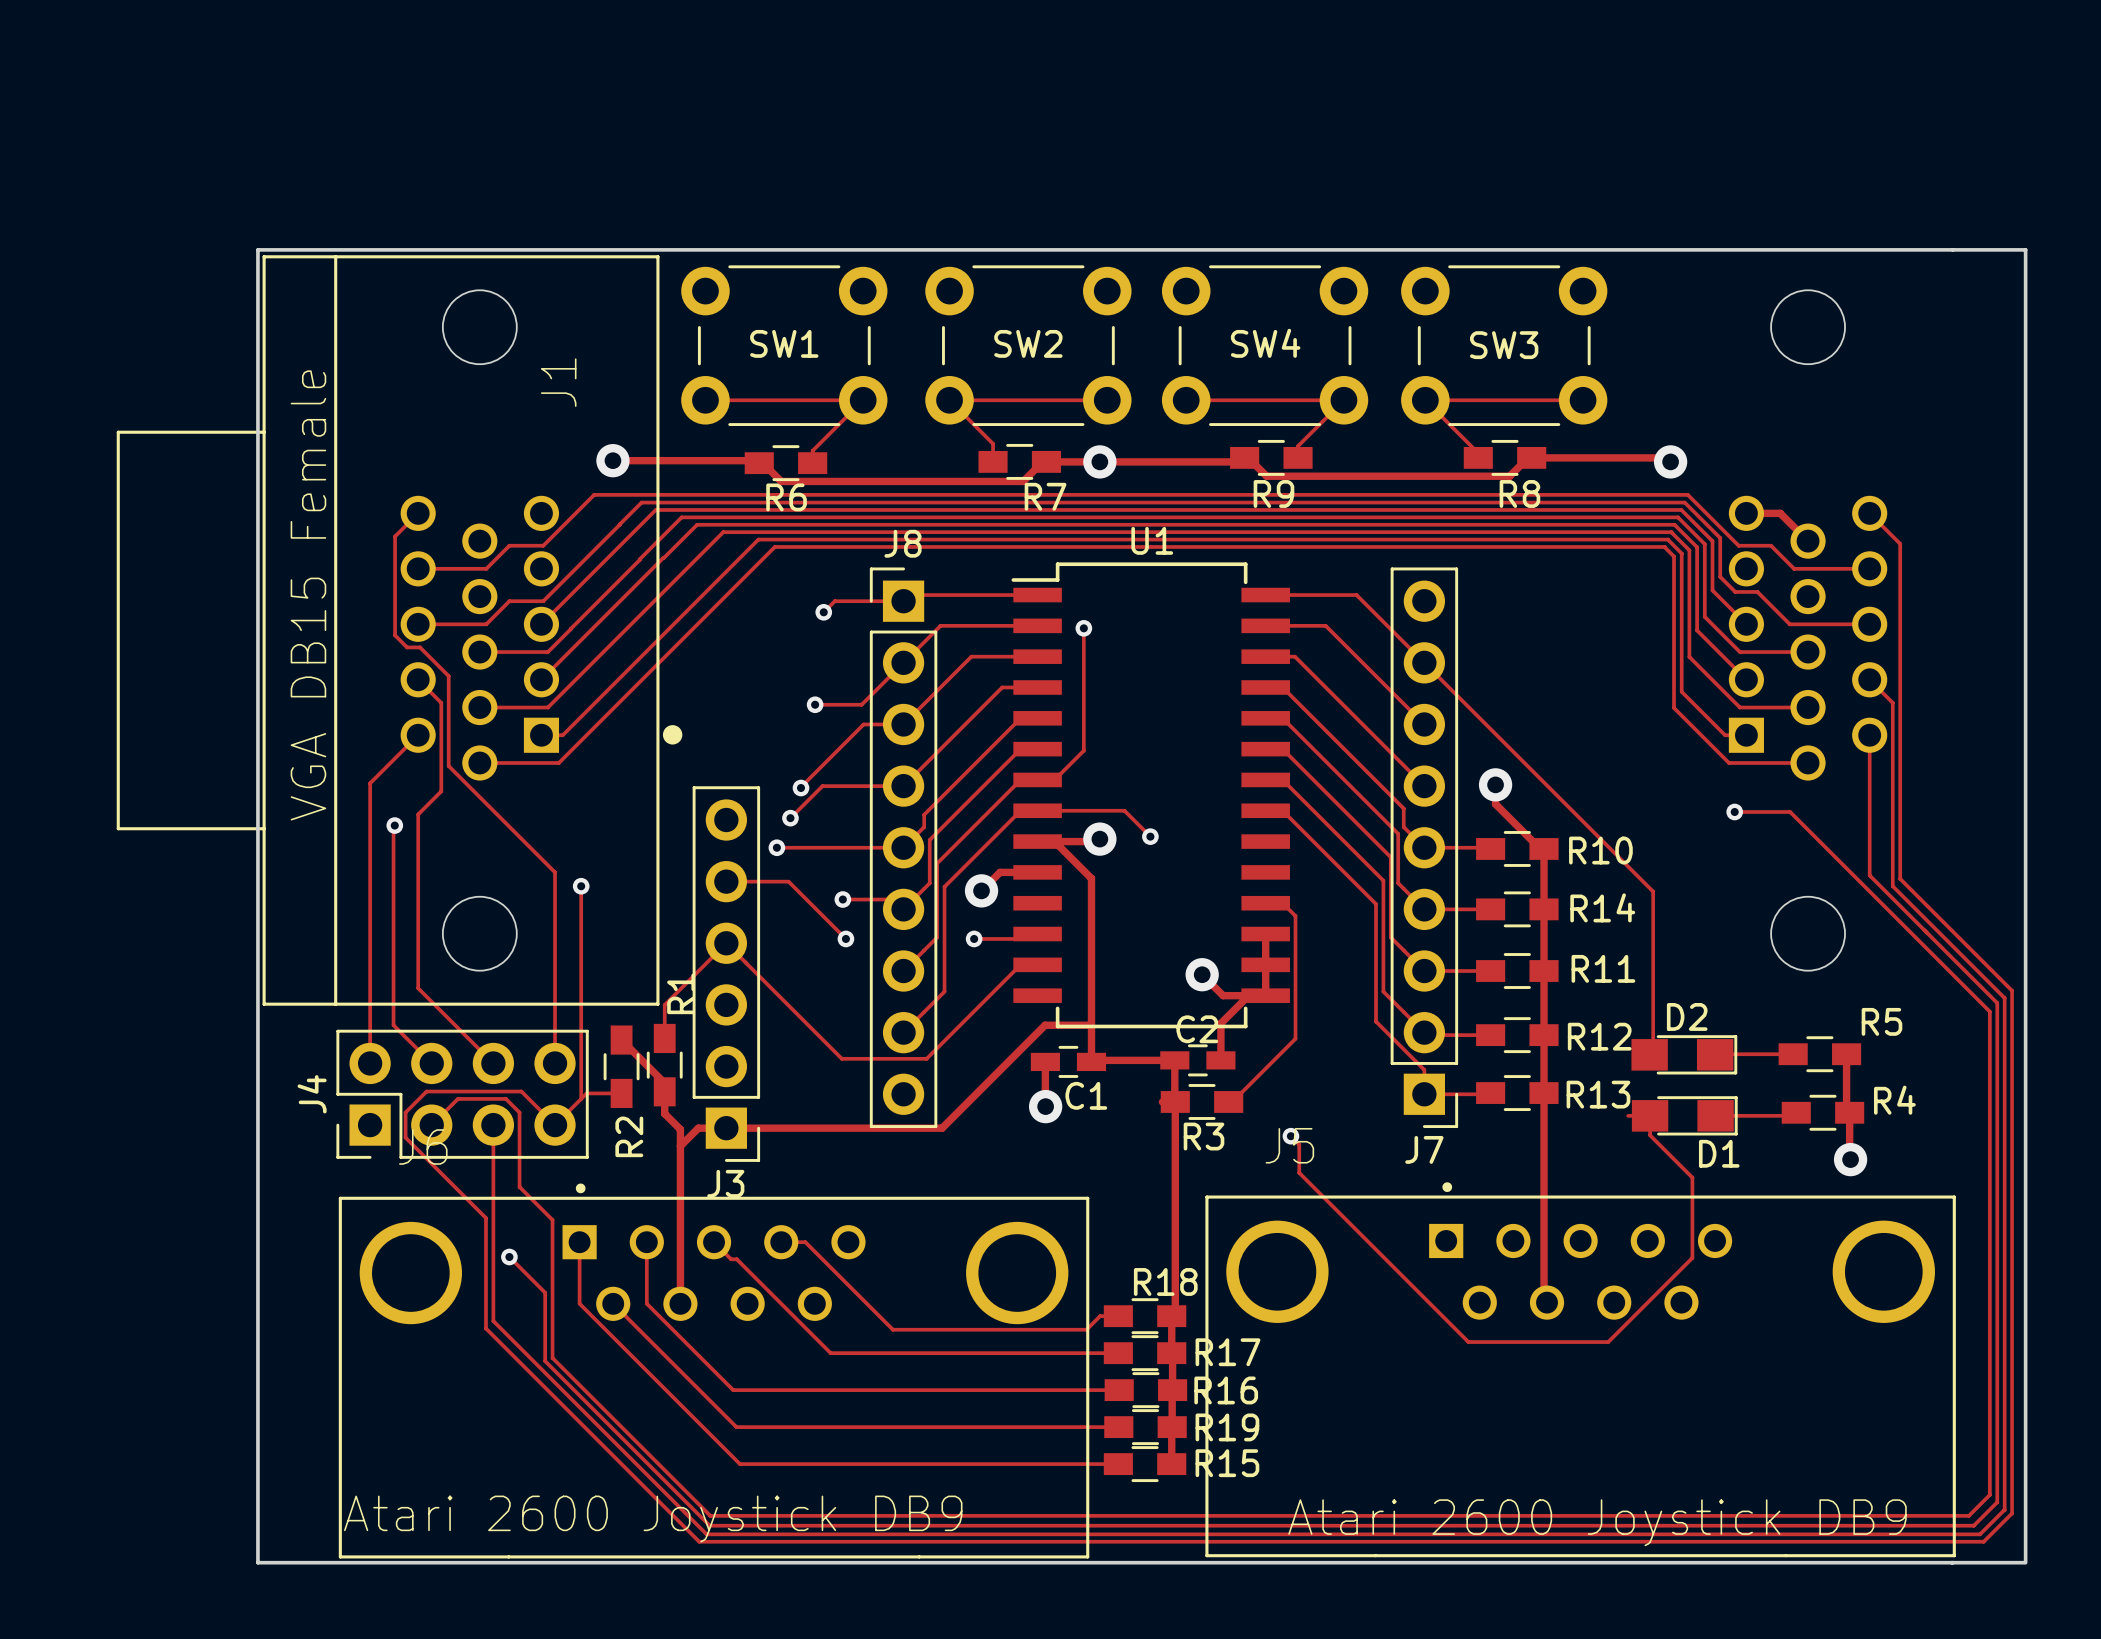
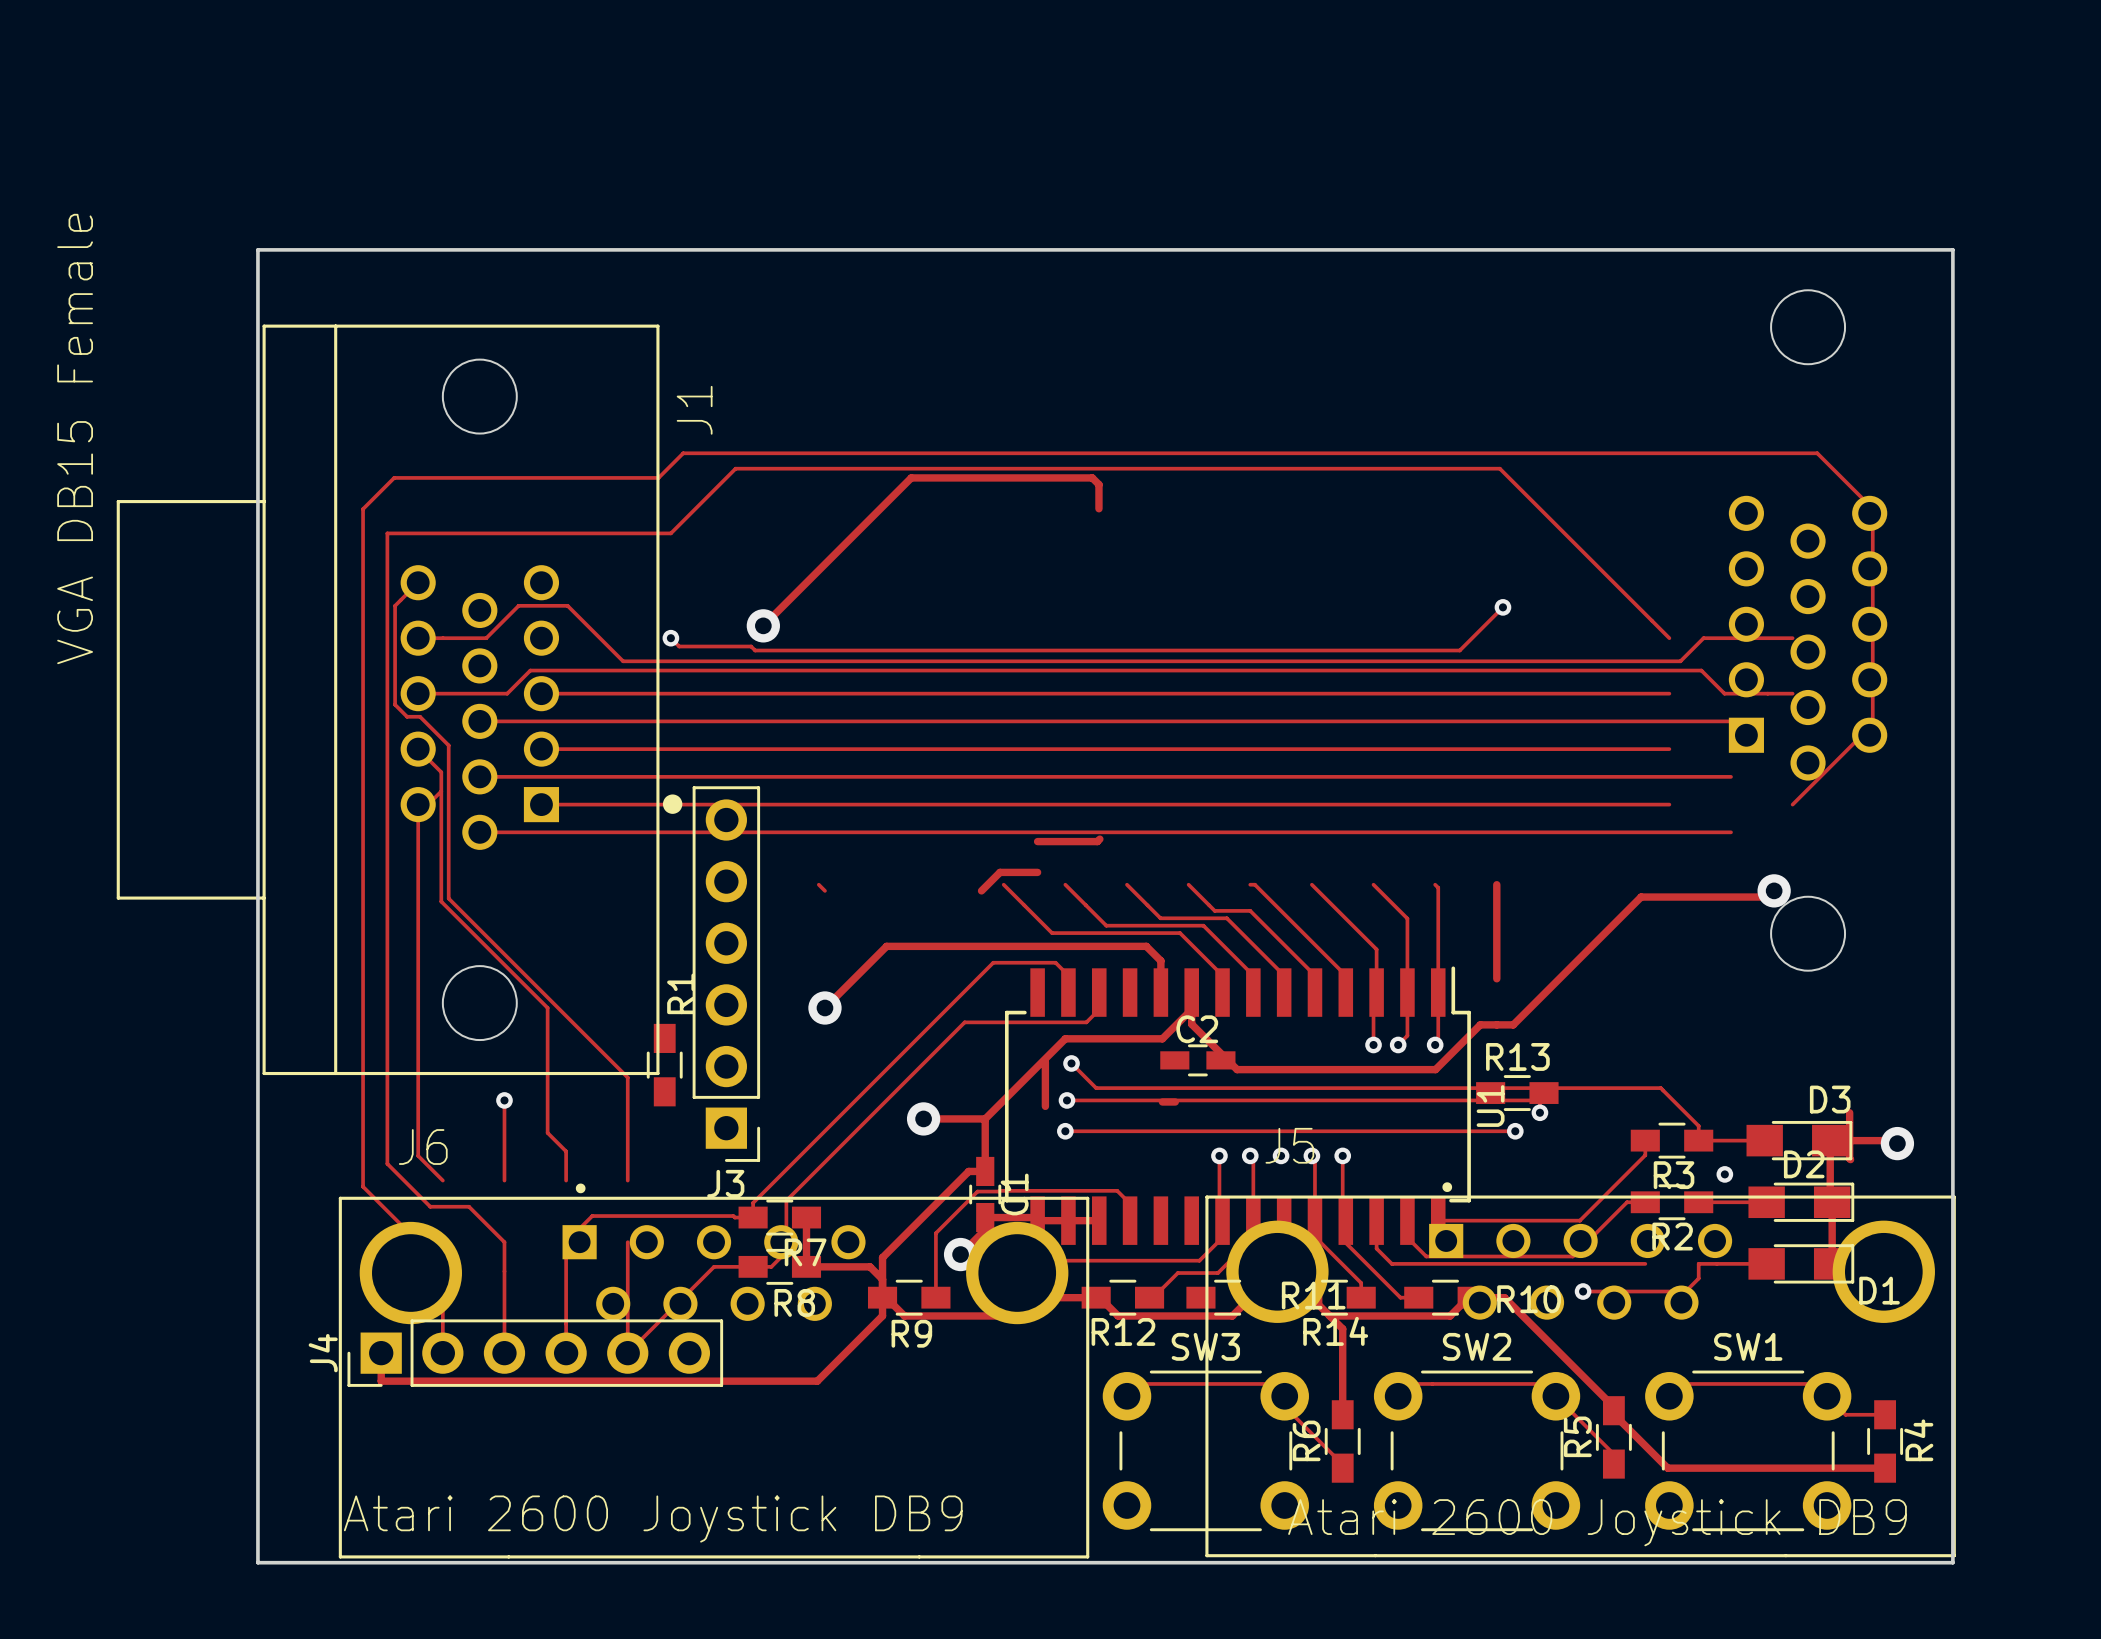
board edge: (1952, 249) (2025, 249) (2025, 1562) -> (1952, 249) (1952, 1562)
SW1 name position: SW1 (784, 343) -> SW1 (1748, 1346)
SW2 name position: SW2 (1028, 343) -> SW2 (1477, 1346)
SW1 position: (784, 345) -> (1748, 1450)
SW2 position: (1028, 345) -> (1477, 1450)
SW4: (1265, 345) -> none
SW3 position: (1504, 345) -> (1205, 1450)
SW3 name position: SW3 (1504, 345) -> SW3 (1205, 1346)
J1 name position: J1 (558, 382) -> J1 (694, 410)
track: (705, 400) (863, 400) (812, 450) (812, 463) -> none
track: (1107, 400) (949, 400) (993, 443) (993, 461) -> none
track: (1186, 400) (1343, 400) (1298, 446) (1298, 457) -> none
track: (1583, 400) (1425, 400) (1478, 453) (1478, 457) -> none
R9 position: (1271, 457) -> (909, 1297)
R8 position: (1505, 457) -> (779, 1266)
track: (612, 460) (756, 460) (762, 463) (781, 481) (1023, 481) (1042, 461) (1240, 461) (1244, 457) (1248, 457) (1266, 476) (1509, 476) (1528, 457) (1666, 457) (1670, 461) -> none
via: (612, 460) -> none
R7 position: (1019, 461) -> (779, 1217)
via: (1099, 461) -> none
via: (1670, 461) -> none
R6 rotation: 0° (785, 463) -> 90° clockwise (1342, 1441)
R6 position: (785, 463) -> (1342, 1441)
track: none -> (1098, 508) (1098, 484) (1092, 477) (911, 477) (763, 625)
track: (418, 513) (395, 536) (395, 605) -> (418, 582) (395, 605)
track: (1746, 513) (1780, 513) (1808, 541) -> none
track: (1869, 513) (1900, 543) (1900, 878) (2012, 990) (2012, 1513) (1983, 1541) (699, 1541) (485, 1328) (485, 1218) (405, 1137) (405, 1112) (426, 1091) (521, 1091) (555, 1125) (586, 1093) (621, 1093) -> none
track: (619, 524) (641, 502) (1684, 502) (1720, 538) (1720, 576) (1735, 591) (1757, 591) (1789, 624) (1869, 624) -> none
track: (619, 524) (543, 601) (509, 601) (486, 624) (418, 624) -> none
track: (1671, 532) (723, 532) (547, 707) (479, 707) -> none
track: (1671, 532) (1689, 550) (1689, 656) (1739, 707) (1808, 707) -> none
track: (1668, 539) (758, 539) (562, 735) (541, 735) -> none
track: (1668, 539) (1682, 553) -> none
track: (1664, 546) (774, 546) (558, 762) (479, 762) -> none
track: (1664, 547) (1674, 556) (1674, 707) (1729, 762) (1808, 762) -> none
track: (1681, 554) (1681, 691) (1725, 735) (1746, 735) -> none
track: (418, 568) (486, 568) (509, 545) (543, 545) (594, 494) (1687, 494) (1738, 545) (1771, 545) (1794, 568) (1869, 568) -> none
J1 value position: VGA DB15 Female (308, 595) -> VGA DB15 Female (75, 438)
track: (1037, 595) (909, 595) (903, 601) (834, 601) (823, 612) -> none
track: (1265, 595) (1356, 595) (1653, 891) (1653, 1054) -> none
track: none -> (1502, 607) (1459, 650) (755, 650) (751, 646) (679, 646) (670, 638)
via: none -> (1502, 607)
via: (823, 612) -> none
track: (541, 624) (655, 509) (1681, 509) (1712, 541) (1712, 590) (1746, 624) -> none
via: none -> (763, 625)
track: (1037, 625) (940, 625) (861, 704) (815, 704) -> none
track: (1265, 625) (1325, 625) (1424, 724) -> none
track: (570, 628) (681, 517) (1678, 517) (1704, 544) (1704, 616) (1739, 652) (1808, 652) -> none
track: (1083, 628) (1083, 750) (1054, 779) (1020, 779) (937, 863) (937, 937) (903, 971) -> none
via: (1083, 628) -> none
track: (570, 629) (547, 652) (479, 652) -> none
J1 position: (399, 630) -> (399, 699)
track: (395, 635) (407, 647) (420, 647) (448, 676) (448, 745) -> (395, 635) (395, 704) (407, 716) (420, 716) (448, 745)
track: none -> (418, 638) (486, 638) (518, 605) (567, 605) (623, 661) (1680, 661) (1703, 638) (1792, 638)
via: none -> (670, 638)
track: none -> (1669, 638) (1499, 468) (735, 468) (670, 533) (387, 533) (387, 1163) (430, 1206) (469, 1206) (504, 1242) (504, 1353)
track: (1037, 656) (971, 656) (903, 724) (863, 724) (801, 788) -> none
track: (1265, 656) (1294, 656) (1424, 786) -> none
track: (418, 679) (441, 702) (441, 772) -> (418, 749) (441, 772)
track: (541, 679) (697, 524) (1674, 524) (1697, 547) (1697, 630) (1746, 679) -> none
track: (1869, 679) (1892, 702) (1892, 886) (2004, 998) (2004, 1510) (1980, 1534) (706, 1534) (493, 1321) (493, 1125) -> none
track: (1037, 687) (1002, 687) (903, 786) (822, 786) (790, 818) -> none
track: (1265, 687) (1282, 687) (1403, 808) (1403, 827) (1424, 847) (1490, 848) -> none
track: none -> (418, 693) (507, 693) (530, 670) (1701, 670) (1724, 693) (1792, 693)
track: none -> (541, 693) (1669, 693)
via: (815, 704) -> none
track: (1037, 718) (1020, 718) (924, 814) (924, 827) (903, 847) (776, 847) -> none
track: (1265, 718) (1282, 718) (1398, 833) (1398, 883) (1424, 909) (1490, 909) -> none
track: none -> (479, 721) (1731, 721)
track: (418, 735) (370, 783) (370, 1063) -> none
track: (1869, 735) (1869, 875) (1997, 1003) (1997, 1502) (1973, 1525) (709, 1525) (545, 1361) (545, 1292) (509, 1256) -> none
track: (1020, 749) (929, 840) (929, 883) (903, 909) (893, 899) (842, 899) -> (1020, 749) (541, 749)
track: none -> (1037, 749) (1265, 749)
track: (1282, 749) (1390, 857) (1390, 937) (1424, 971) (1490, 971) -> (1282, 749) (1669, 749)
track: (448, 766) (555, 872) (555, 1063) -> (448, 766) (448, 898) (627, 1077) (627, 1180)
track: none -> (479, 776) (1731, 776)
track: (1265, 779) (1282, 779) (1383, 880) (1383, 991) (1426, 1035) (1490, 1035) -> none
track: (1495, 784) (1495, 804) (1540, 848) (1544, 848) (1544, 1299) (1547, 1302) -> none
via: (1495, 784) -> none
via: (801, 788) -> none
track: none -> (441, 791) (441, 901) (547, 1007) (547, 1132) (566, 1151) (566, 1180)
U1 rotation: 0° (1150, 795) -> 90° clockwise (1237, 1105)
U1 position: (1150, 795) -> (1237, 1105)
track: none -> (541, 804) (1669, 804)
track: none -> (1792, 804) (1872, 724) (1872, 508) (1817, 453) (683, 453) (658, 477) (394, 477) (363, 509) (363, 1186) (418, 1242) (442, 1242) (442, 1353)
track: (1265, 810) (1282, 810) (1376, 904) (1376, 1021) (1424, 1069) (1424, 1094) (1490, 1093) -> none
track: (1734, 811) (1790, 811) (1989, 1011) (1989, 1494) (1968, 1515) (710, 1515) (552, 1358) (552, 1220) (519, 1187) (519, 1112) (505, 1098) (457, 1098) (431, 1125) -> none
via: (1734, 811) -> none
via: (790, 818) -> none
track: (394, 825) (393, 1025) (431, 1063) -> none
via: (394, 825) -> none
track: none -> (479, 832) (1731, 832)
track: (1150, 836) (1124, 810) (1020, 810) (944, 886) (944, 991) (903, 1032) -> none
via: (1150, 836) -> none
via: (1099, 839) -> none
track: (1054, 841) (1091, 878) (1091, 1061) (1093, 1060) (1174, 1060) (1175, 1101) -> none
via: (776, 847) -> none
J8: (903, 847) -> none
J7: (1424, 847) -> none
R10 position: (1517, 848) -> (1445, 1297)
track: (726, 881) (788, 881) (845, 938) -> none
track: none -> (818, 884) (824, 890)
track: none -> (1003, 884) (1052, 933) (1180, 933) (1222, 975) (1222, 992)
track: none -> (1065, 884) (1106, 925) (1203, 925) (1253, 975) (1253, 992)
track: none -> (1126, 884) (1160, 918) (1226, 918) (1284, 975) (1284, 992)
track: none -> (1188, 884) (1214, 910) (1250, 910) (1314, 975) (1314, 992)
track: none -> (1250, 884) (1254, 884) (1345, 975) (1345, 992)
track: none -> (1311, 884) (1376, 949) (1376, 992) (1373, 995) (1373, 1044)
track: none -> (1373, 884) (1407, 918) (1407, 1035) (1398, 1044)
track: none -> (1435, 884) (1438, 887) (1438, 1041) (1435, 1044)
track: none -> (1496, 884) (1496, 978)
track: (581, 886) (581, 1098) -> none
via: (581, 886) -> none
via: (981, 890) -> none
track: none -> (1774, 890) (1767, 897) (1641, 897) (1513, 1024) (1480, 1024) (1435, 1069) (1237, 1069) (1191, 1024) (1191, 975)
via: none -> (1774, 890)
via: (842, 899) -> none
track: (1265, 903) (1282, 903) (1295, 916) (1295, 1038) (1232, 1101) (1228, 1101) -> none
R14 name position: R14 (1602, 907) -> R14 (1335, 1331)
R14 position: (1517, 909) -> (1334, 1297)
track: (1037, 934) (1032, 938) (974, 938) -> none
track: (1265, 934) (1265, 995) (1223, 995) (1202, 974) -> none
via: (845, 938) -> none
via: (974, 938) -> none
track: (1037, 964) (1020, 964) (926, 1058) (841, 1058) (726, 943) (664, 1004) (664, 1038) -> none
R11 position: (1517, 971) -> (1227, 1297)
via: (1202, 974) -> none
track: (418, 988) (493, 1063) -> (418, 988) (418, 1155) (442, 1180)
track: none -> (1068, 992) (1068, 975) (1055, 962) (993, 962) (753, 1202) (753, 1217) (592, 1216) (566, 1242) (566, 1353)
track: none -> (1099, 992) (1099, 1009) (1086, 1022) (964, 1022) (786, 1200) (786, 1251) (771, 1266) (714, 1266) (627, 1353) (627, 1242)
track: none -> (1160, 992) (1160, 960) (1146, 946) (886, 946) (824, 1007)
track: (1248, 995) (1220, 1023) (1220, 1060) (1215, 1060) -> none
via: none -> (824, 1007)
track: none -> (1191, 1009) (1162, 1038) (1065, 1038) (985, 1118)
R5 name position: R5 (1881, 1021) -> R5 (1577, 1436)
track: (1091, 1025) (1045, 1025) (942, 1128) (698, 1128) (680, 1146) -> none
J4 footprint: [336, 1029, 589, 1159] -> [347, 1319, 724, 1387]
R12 position: (1517, 1035) -> (1122, 1297)
R12 name position: R12 (1599, 1036) -> R12 (1123, 1331)
track: (621, 1040) (664, 1083) (664, 1113) (680, 1129) (680, 1303) -> none
via: none -> (1373, 1044)
via: none -> (1398, 1044)
via: none -> (1435, 1044)
D2 position: (1684, 1054) -> (1801, 1202)
track: (1718, 1054) (1793, 1054) -> none
R5 rotation: 0° (1819, 1054) -> 90° clockwise (1613, 1437)
R5 position: (1819, 1054) -> (1613, 1437)
track: (1846, 1054) (1846, 1109) (1849, 1112) (1846, 1112) -> none
C1 rotation: 0° (1068, 1061) -> 90° clockwise (985, 1194)
C1 position: (1068, 1061) -> (985, 1194)
track: none -> (1066, 1063) (1071, 1063) (1096, 1088) (1660, 1088) (1698, 1126) (1698, 1140) (1764, 1140)
via: none -> (1071, 1063)
R2 rotation: 0° (621, 1066) -> 90° clockwise (1672, 1202)
R2 position: (621, 1066) -> (1672, 1202)
J4 name position: J4 (312, 1094) -> J4 (323, 1353)
R13 name position: R13 (1598, 1094) -> R13 (1517, 1056)
track: none -> (504, 1100) (504, 1180)
via: none -> (504, 1100)
track: none -> (1067, 1100) (1539, 1100) (1539, 1112)
via: none -> (1067, 1100)
track: (1175, 1101) (1175, 1312) (1171, 1316) (1171, 1464) -> none
R3 position: (1201, 1101) -> (1672, 1140)
via: (1045, 1106) -> none
via: none -> (1539, 1112)
track: (1796, 1112) (1793, 1115) (1715, 1115) -> none
R4 rotation: 0° (1822, 1112) -> 90° clockwise (1885, 1441)
R4 position: (1822, 1112) -> (1885, 1441)
track: (1628, 1115) (1650, 1115) (1650, 1135) (1692, 1177) (1692, 1257) (1608, 1342) (1468, 1342) (1299, 1172) (1299, 1144) (1290, 1136) -> none
D1 position: (1684, 1115) -> (1801, 1263)
track: none -> (923, 1118) (985, 1118)
via: none -> (923, 1118)
track: none -> (985, 1118) (985, 1171) (968, 1171) (882, 1257) (882, 1315) (817, 1381) (381, 1381) (381, 1353)
track: none -> (1065, 1131) (1515, 1131)
via: none -> (1065, 1131)
via: none -> (1515, 1131)
via: (1290, 1136) -> none
track: none -> (1645, 1140) (1645, 1155) (1579, 1220) (1438, 1220)
D3: none -> (1799, 1140)
track: none -> (1897, 1143) (1894, 1140) (1830, 1140) (1832, 1263)
D1 name position: D1 (1719, 1153) -> D1 (1879, 1290)
track: none -> (1219, 1155) (1219, 1217) (1222, 1220) (1222, 1237) (1199, 1260) (1046, 1260) (1009, 1297) (991, 1297)
via: none -> (1219, 1155)
track: none -> (1250, 1155) (1253, 1159) (1253, 1237) (1217, 1273) (1177, 1273) (1153, 1297) (1149, 1297)
via: none -> (1250, 1155)
via: none -> (1281, 1155)
track: none -> (1311, 1155) (1314, 1159) (1314, 1236) (1361, 1283) (1361, 1297)
via: none -> (1311, 1155)
track: none -> (1342, 1155) (1342, 1217) (1345, 1220) (1345, 1242) (1400, 1297) (1418, 1297)
via: none -> (1342, 1155)
via position: (1850, 1159) -> (1897, 1143)
via: none -> (1724, 1174)
track: none -> (1645, 1202) (1627, 1202) (1572, 1256) (1426, 1256) (1407, 1237) (1407, 1220)
track: none -> (1698, 1202) (1766, 1202)
track: none -> (806, 1217) (806, 1266) (870, 1266) (882, 1279)
track: none -> (1099, 1220) (1037, 1220) (1034, 1217) (985, 1217) (985, 1229) (960, 1254)
track: none -> (1130, 1220) (1130, 1203) (1117, 1190) (977, 1191) (935, 1233) (935, 1297)
track: none -> (1376, 1220) (1376, 1248) (1392, 1264)
track: (579, 1242) (579, 1303) (739, 1464) (1118, 1464) -> none
track: (646, 1242) (646, 1303) (733, 1390) (1119, 1390) -> none
track: (714, 1242) (731, 1259) (736, 1259) (830, 1353) (1118, 1353) -> none
track: (781, 1242) (805, 1242) (892, 1329) (1086, 1329) (1100, 1316) (1118, 1316) -> none
via: none -> (960, 1254)
via: (509, 1256) -> none
track: none -> (1392, 1263) (1645, 1263)
track: none -> (1766, 1263) (1698, 1263) (1698, 1278) (1685, 1291) (1583, 1291)
via: none -> (1583, 1291)
track: none -> (882, 1297) (886, 1297) (904, 1315) (1022, 1315) (1041, 1297) (1099, 1297) (1118, 1315) (1232, 1315) (1250, 1297) (1311, 1297) (1342, 1328) (1342, 1414)
track: (613, 1303) (736, 1427) (1118, 1427) -> none
track: none -> (1329, 1315) (1450, 1315) (1468, 1297) (1504, 1297) (1613, 1407) (1613, 1414) (1667, 1468) (1885, 1468)
R18: (1145, 1316) -> none
R17: (1145, 1353) -> none
track: none -> (1126, 1383) (1284, 1383)
track: none -> (1398, 1383) (1555, 1383)
track: none -> (1663, 1383) (1820, 1383)
R16: (1145, 1390) -> none
track: none -> (1284, 1396) (1284, 1406) (1342, 1464) (1342, 1468)
track: none -> (1555, 1396) (1613, 1454) (1613, 1464)
track: none -> (1827, 1396) (1845, 1414) (1885, 1414)
R19: (1145, 1427) -> none
R15: (1145, 1464) -> none
board edge: (1952, 1562) (2024, 1562) -> none

